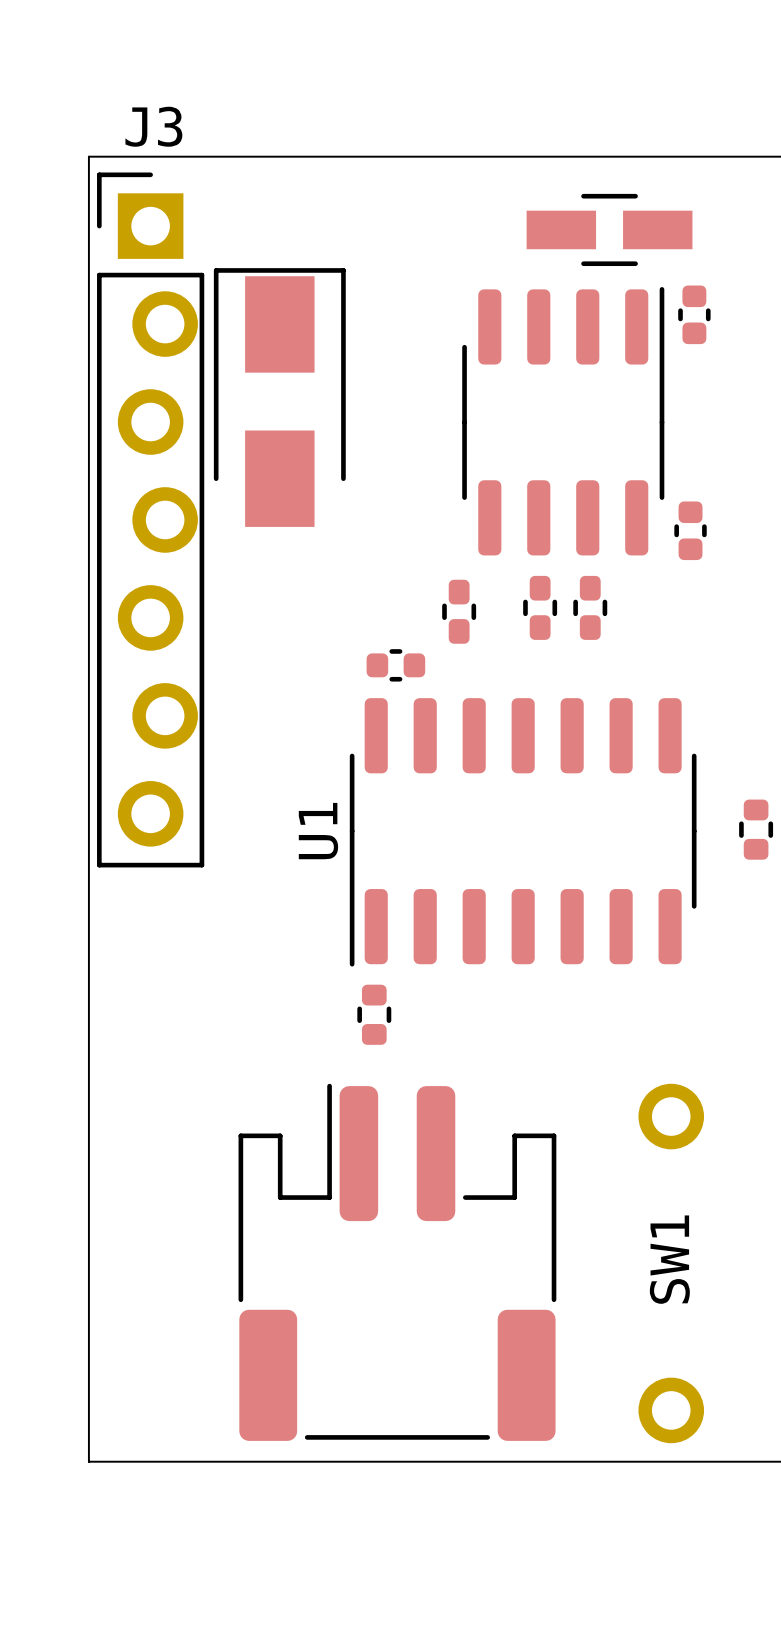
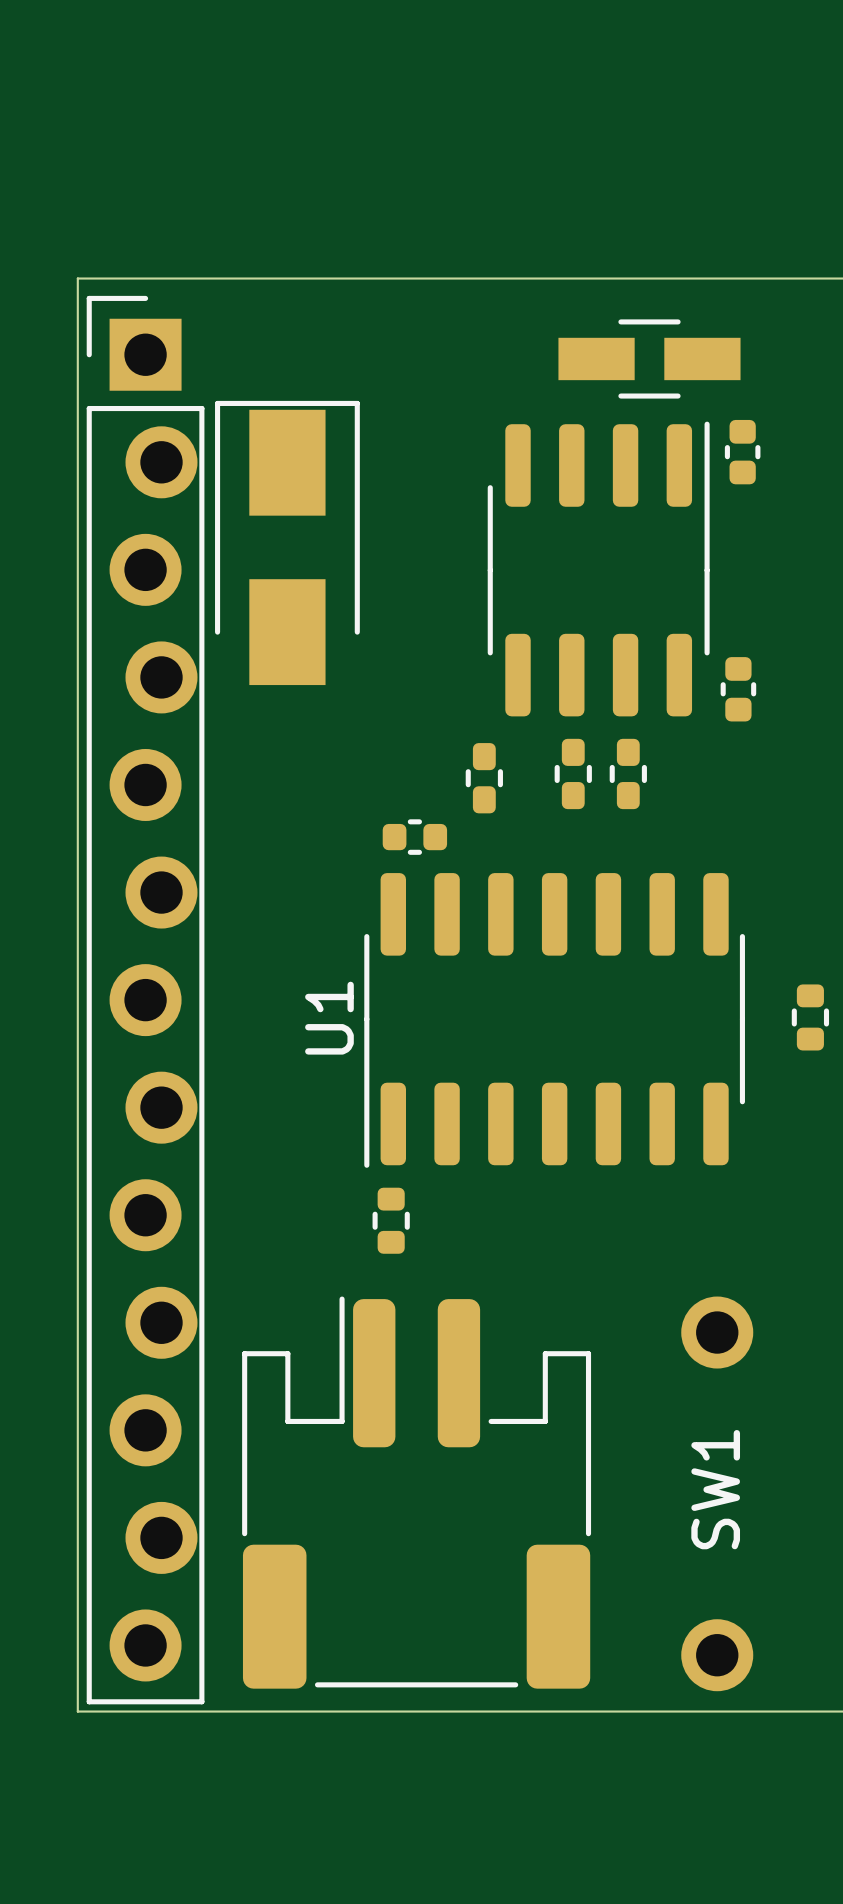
J3: (150, 519) -> none
part: none -> (145, 1000)

